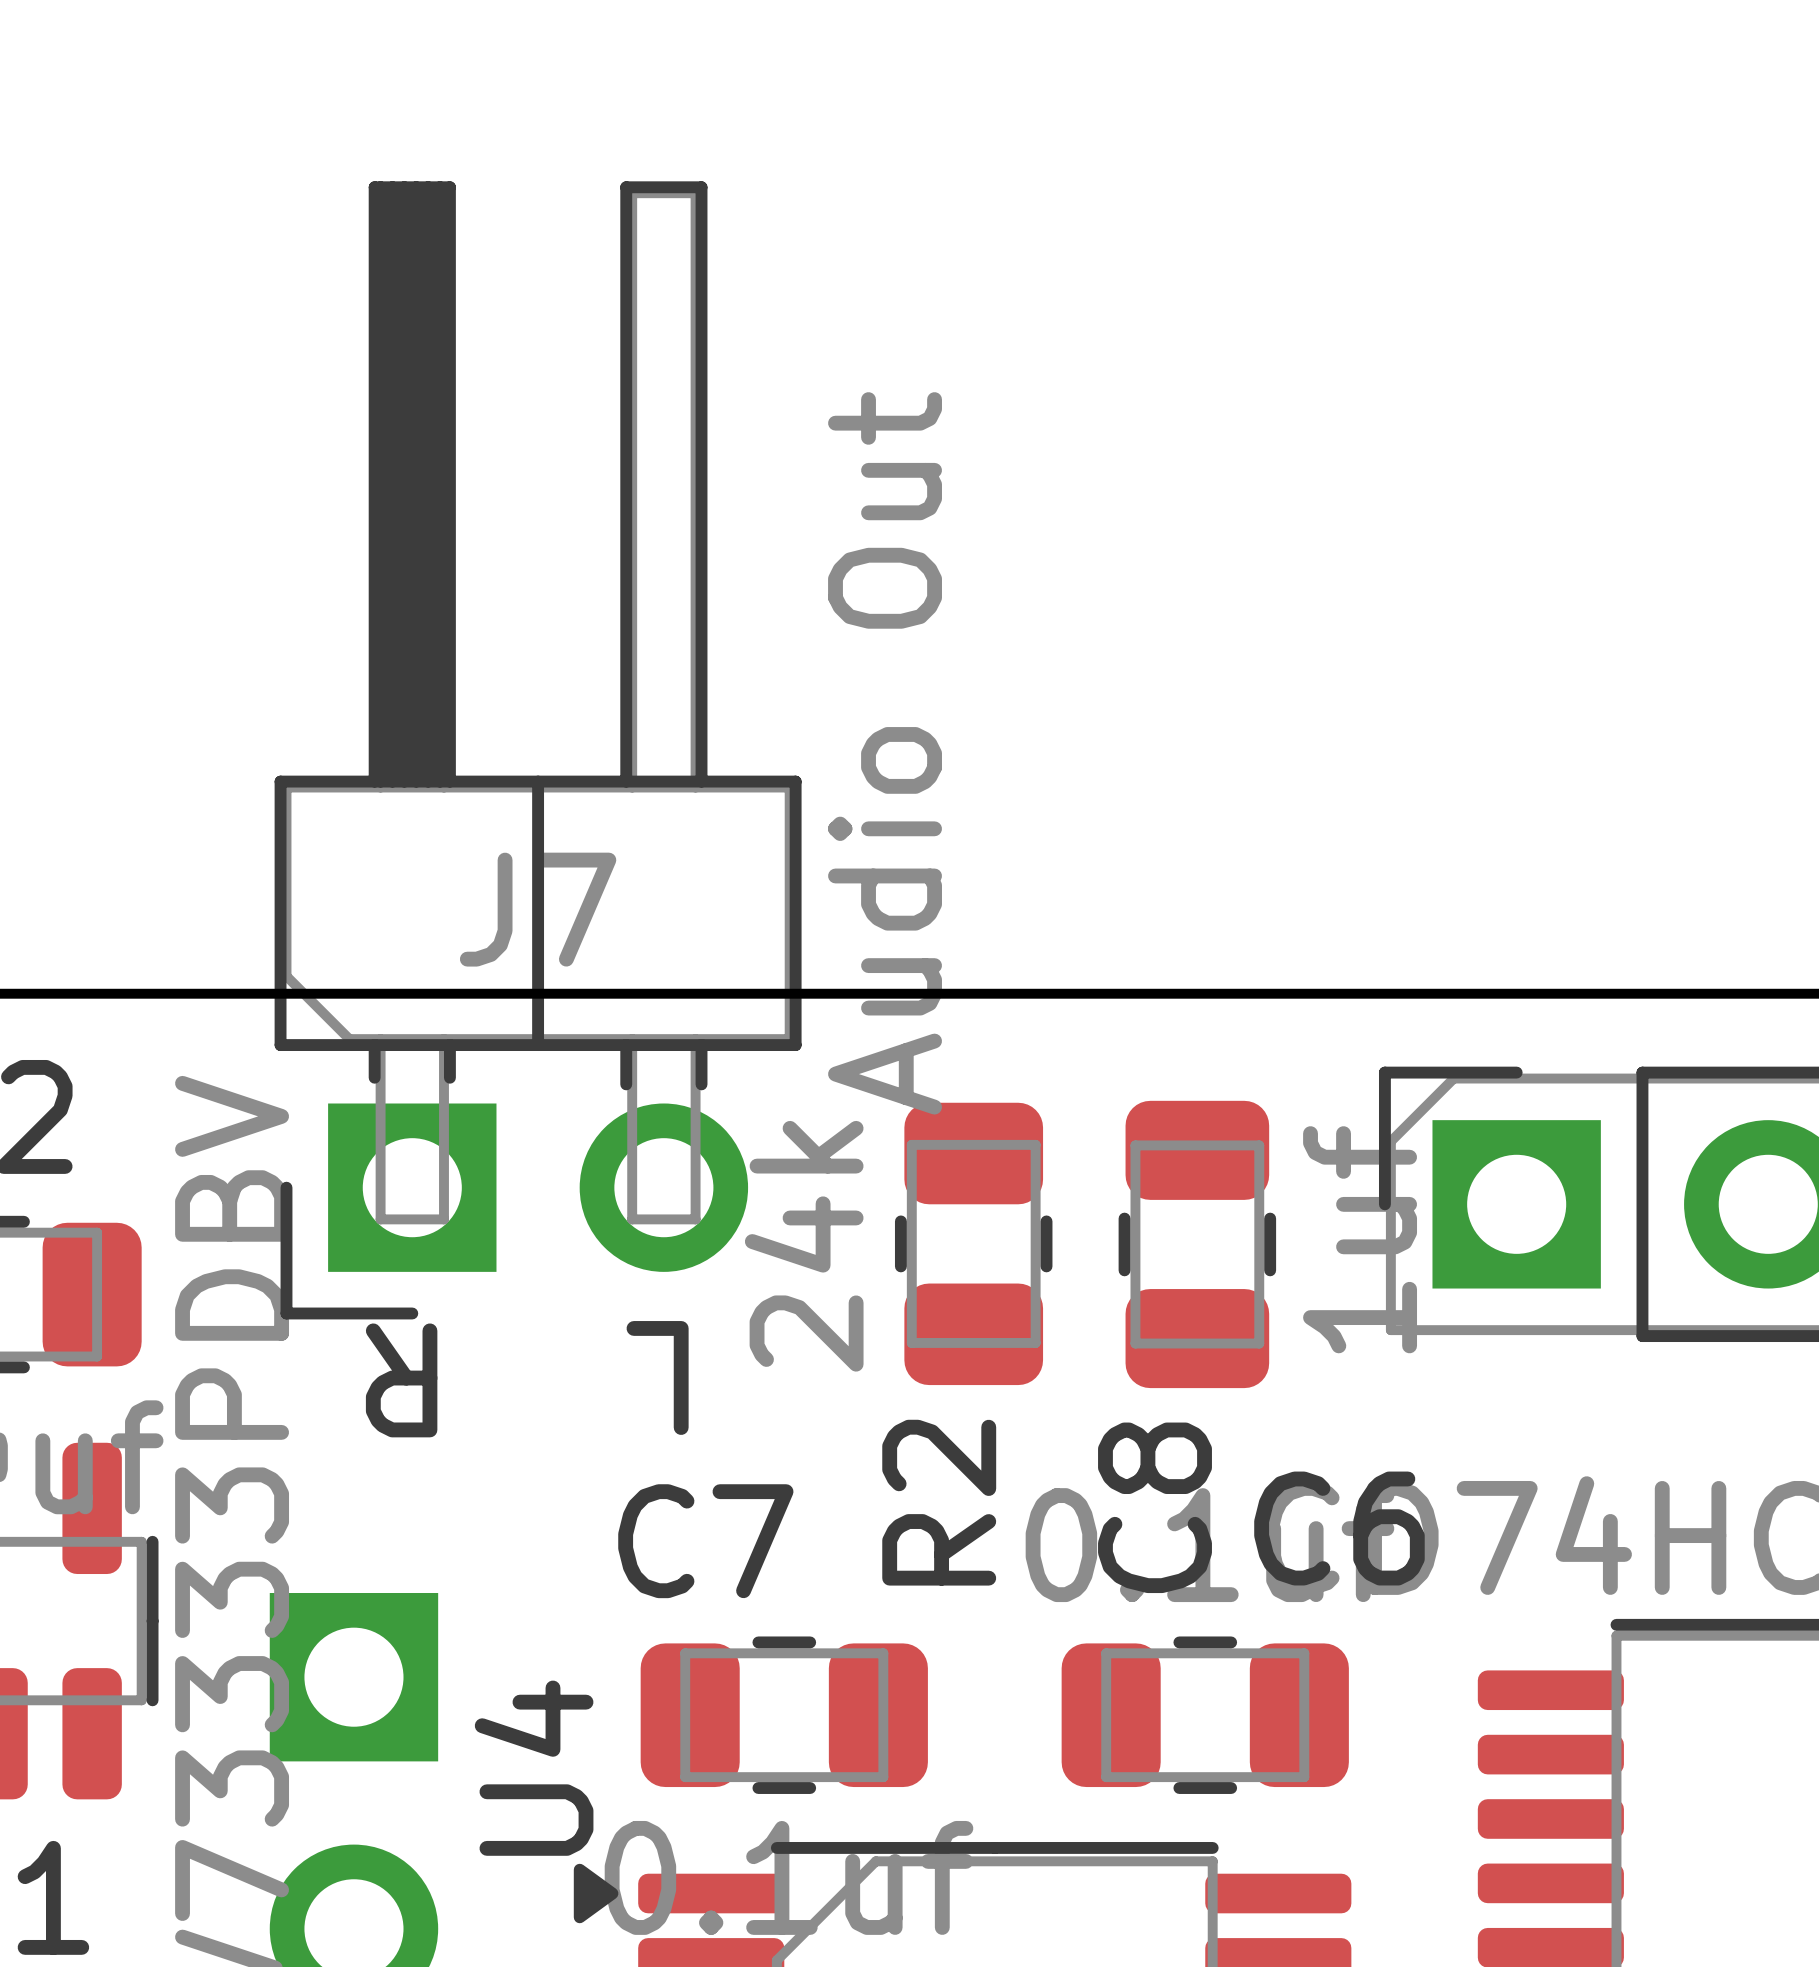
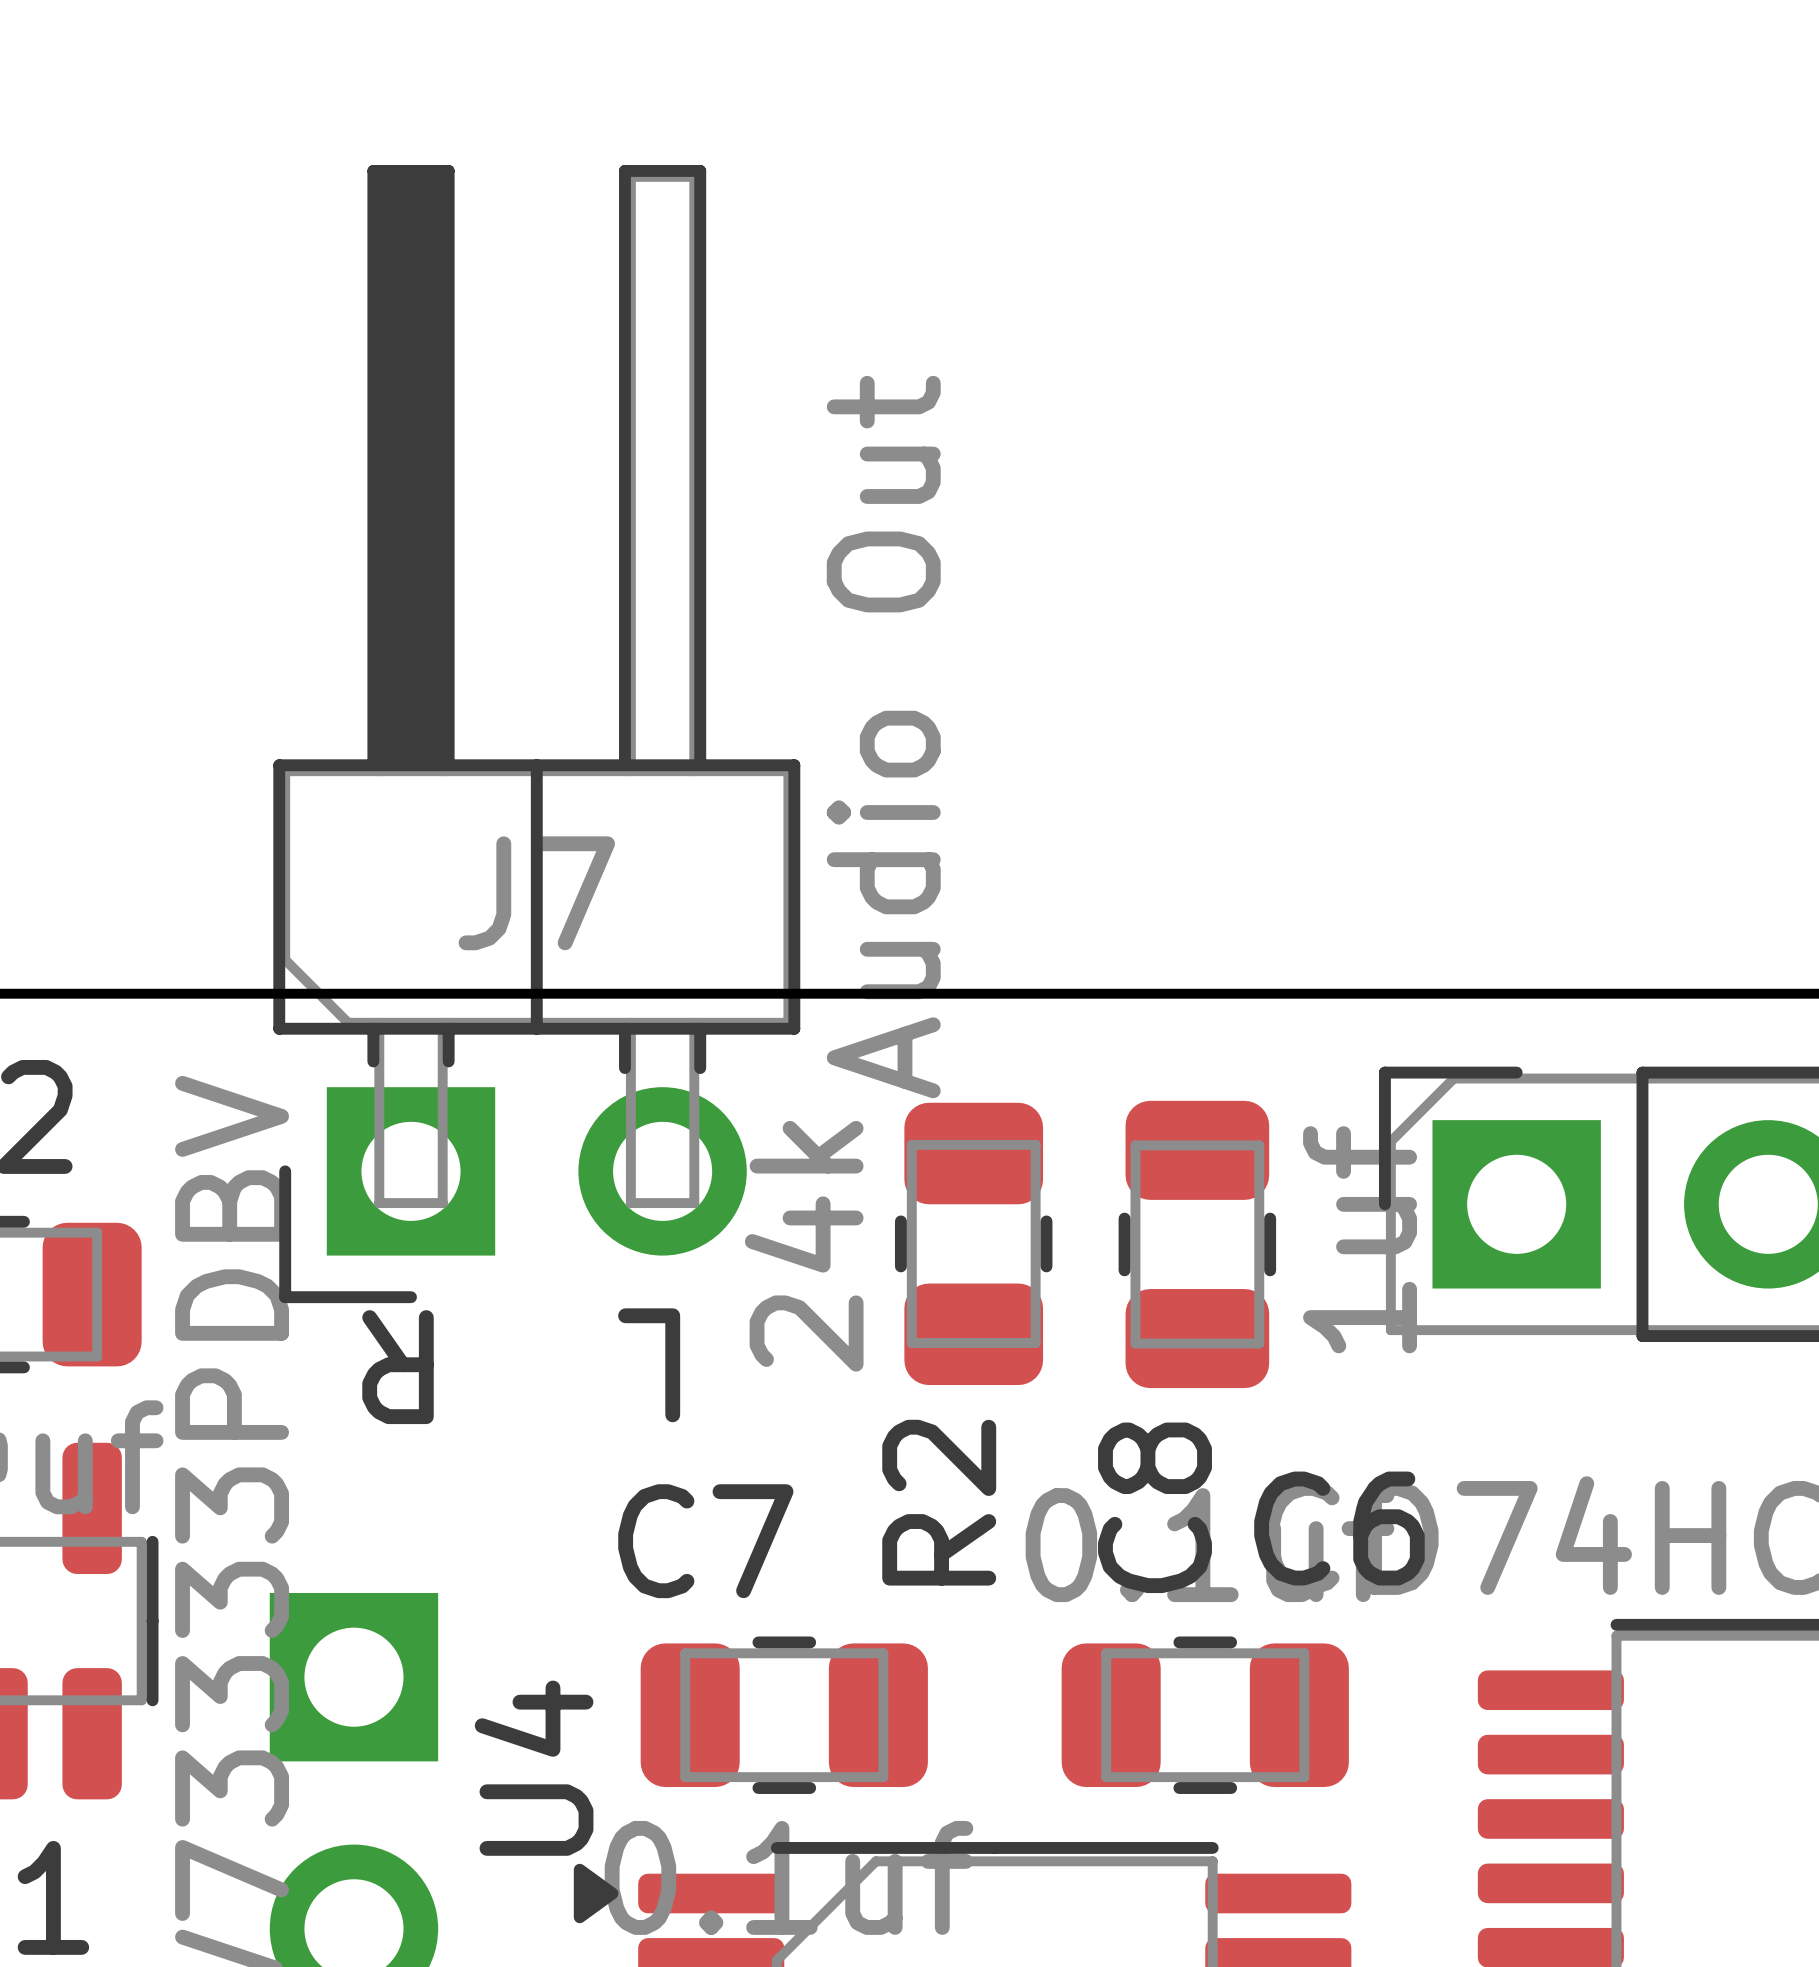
J7 position: (538, 750) -> (536, 734)
text position: L (657, 1377) -> L (649, 1365)
text position: R (401, 1380) -> R (398, 1367)

